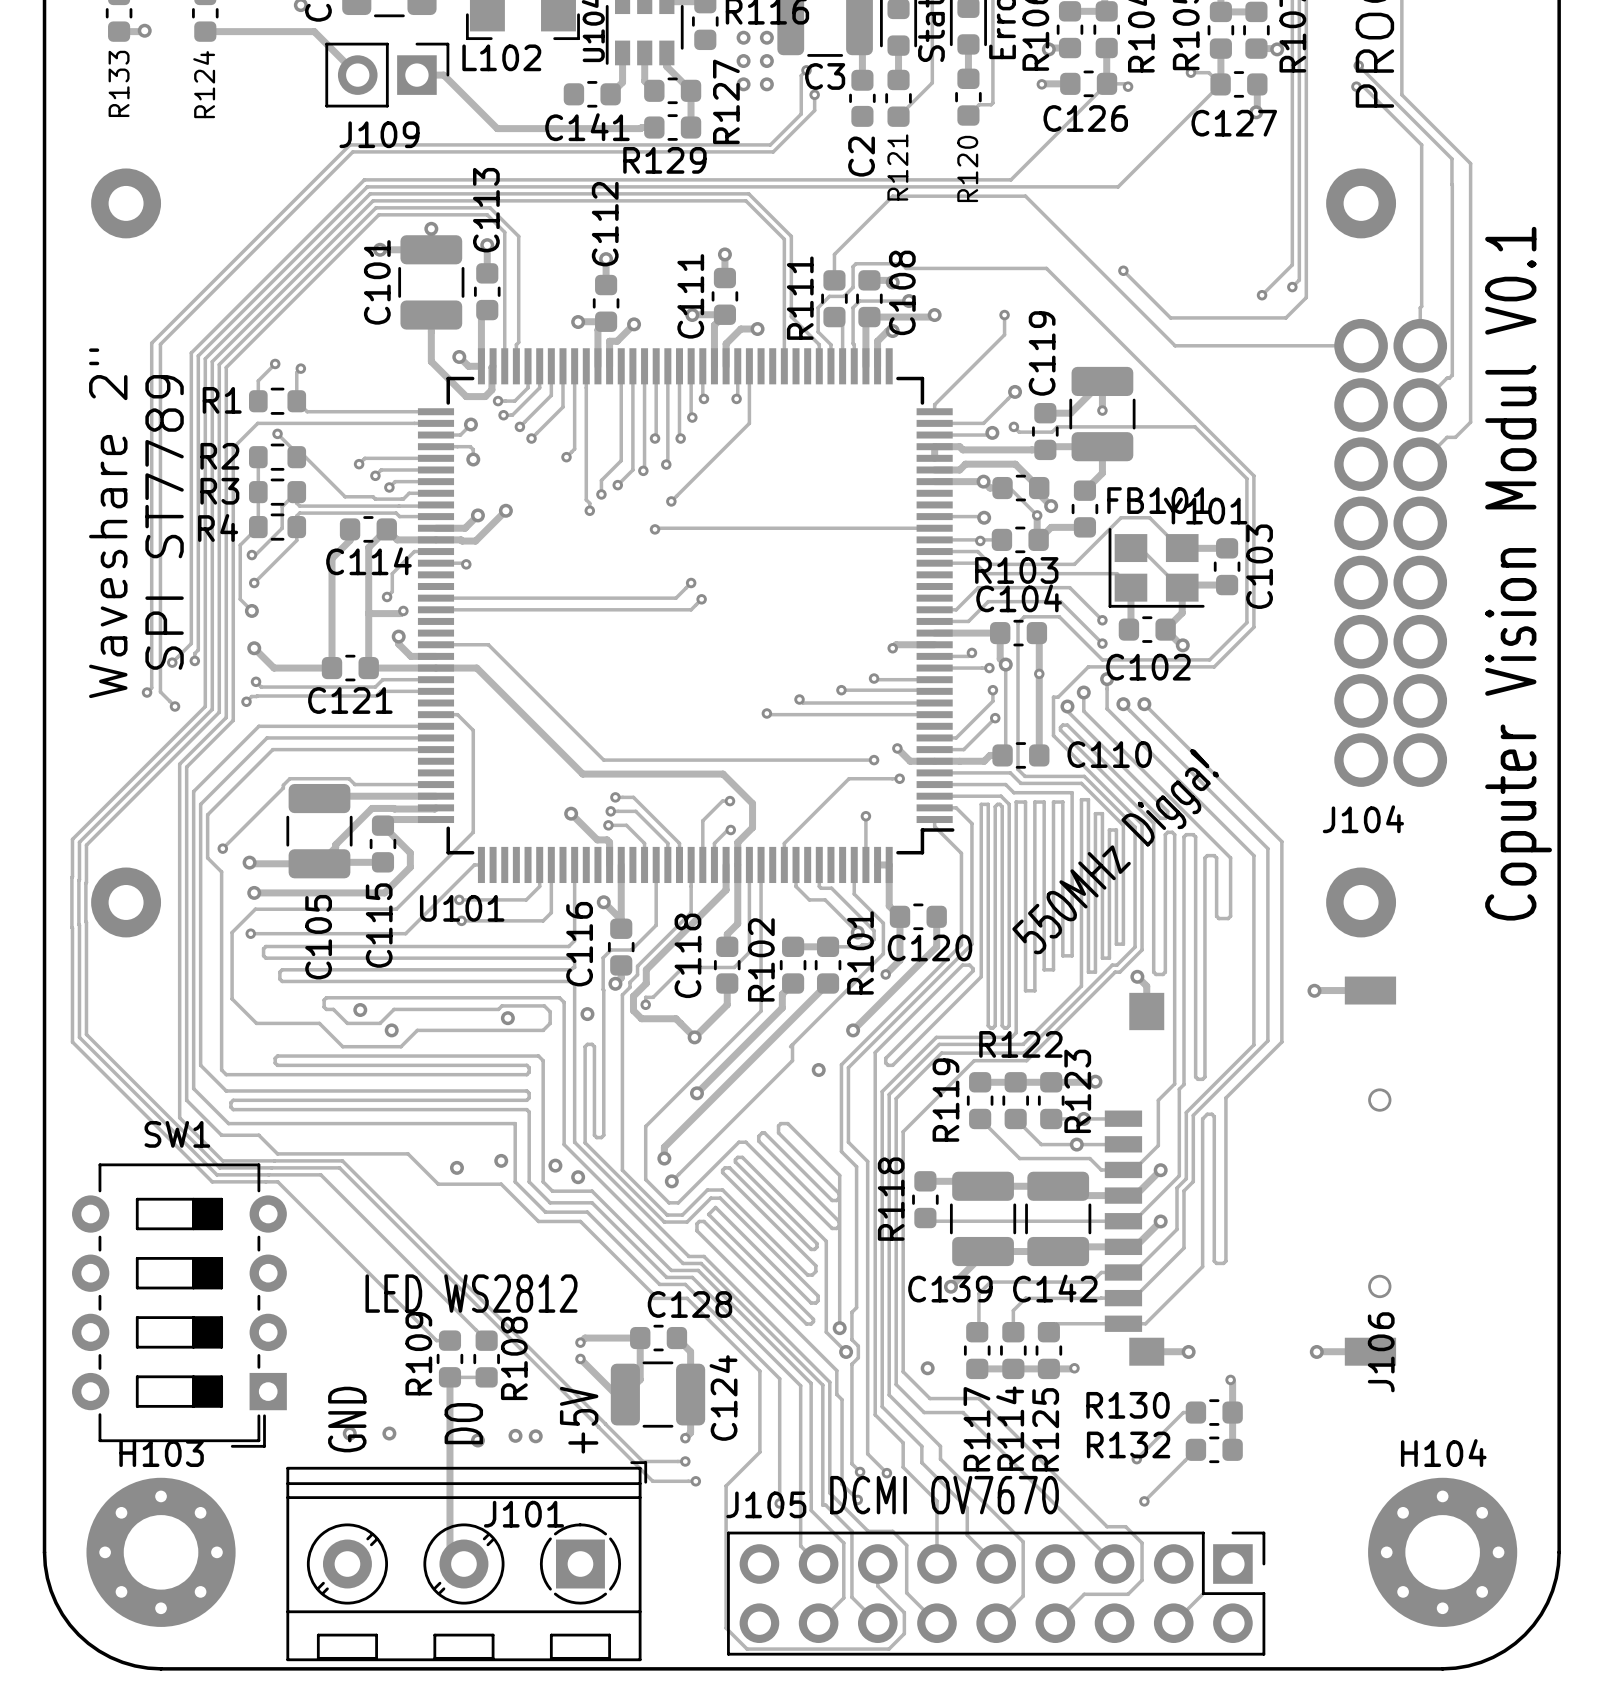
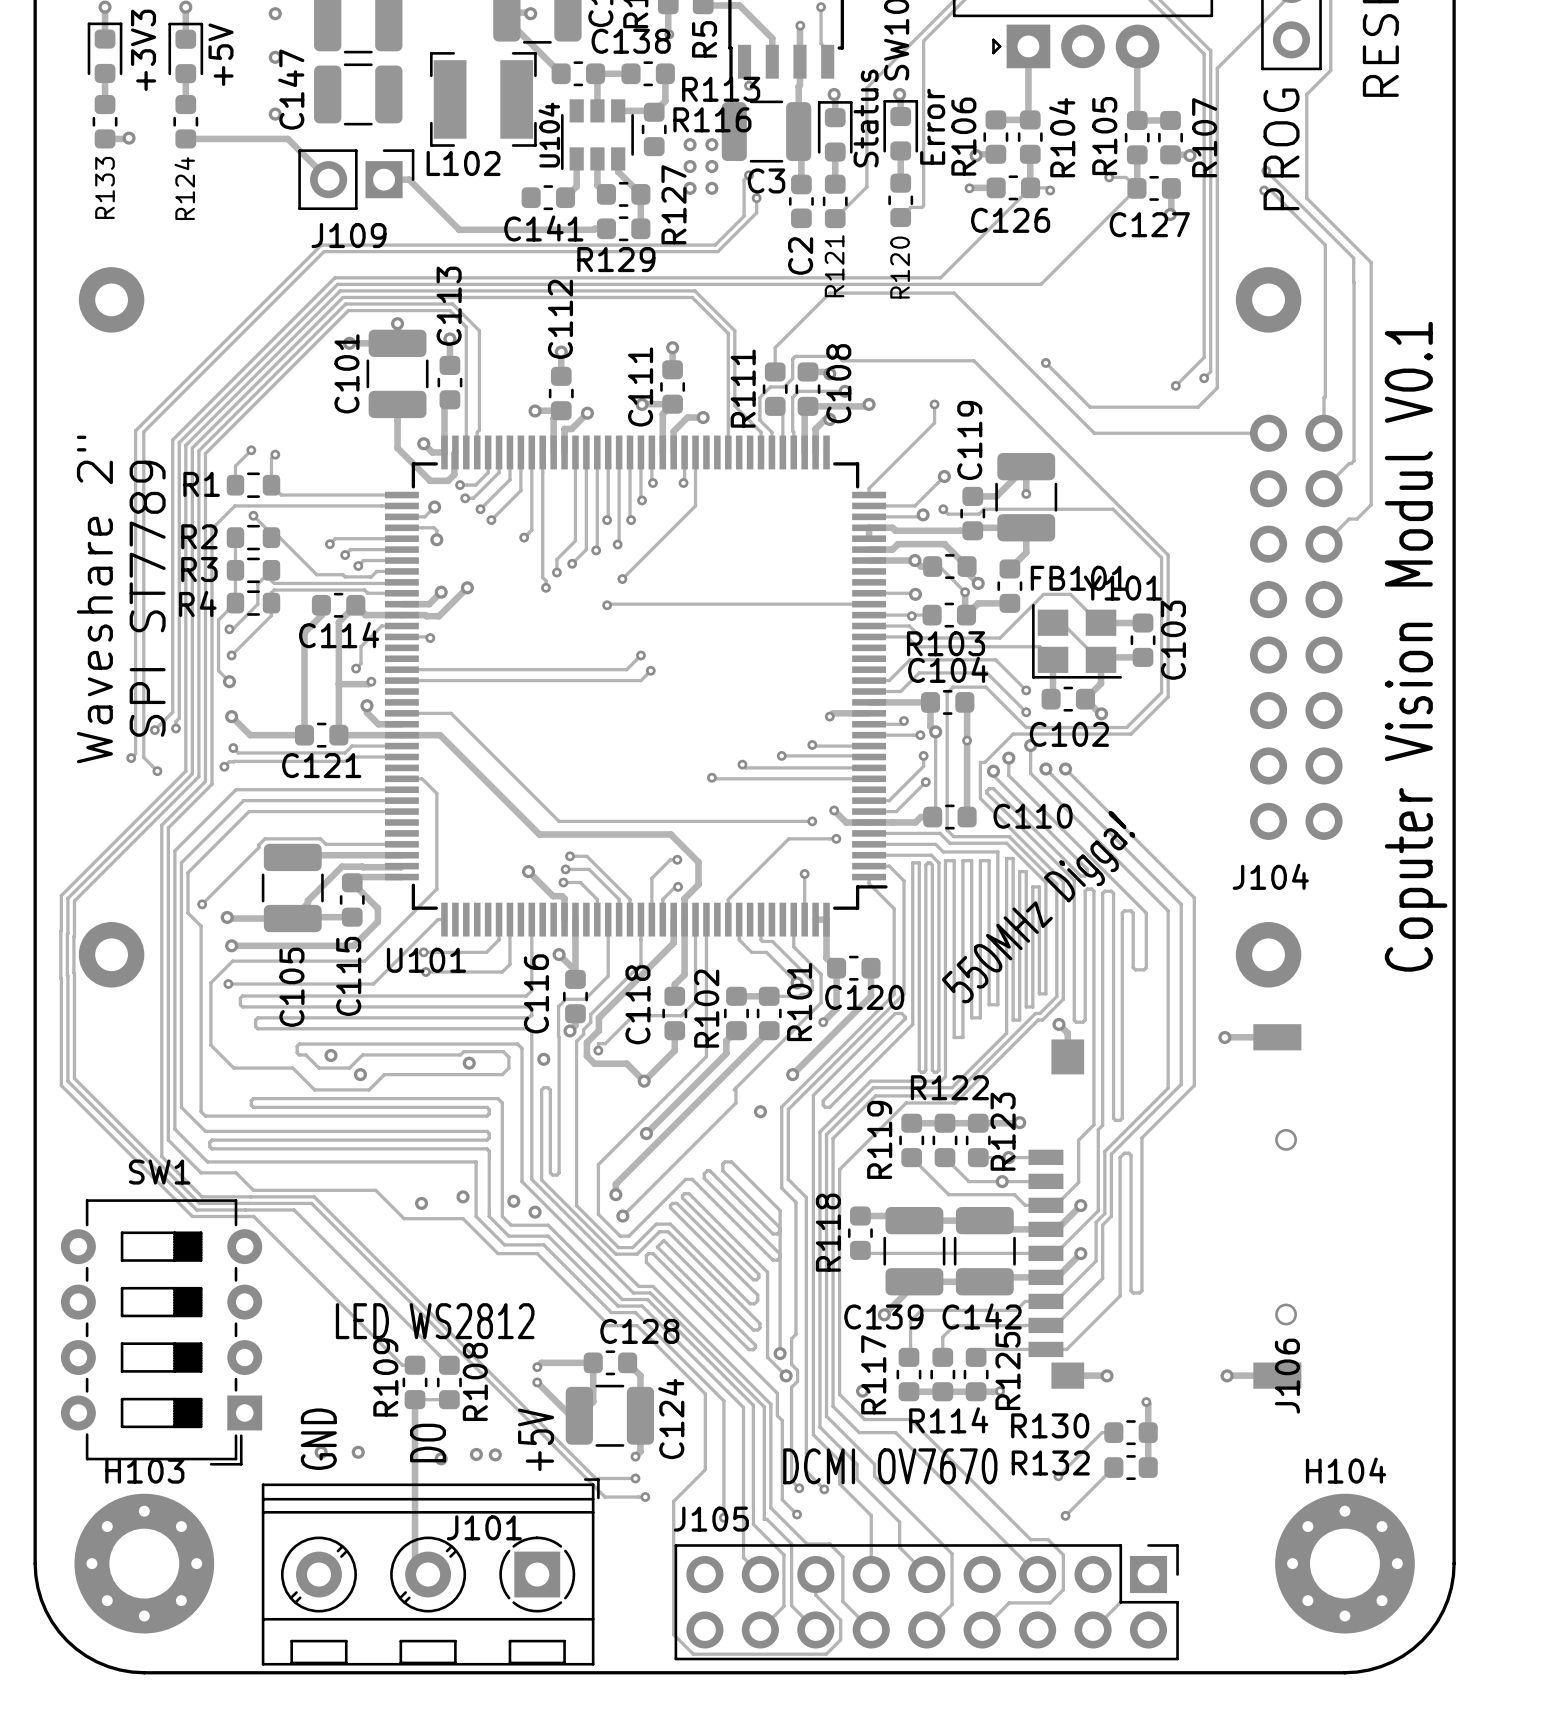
J104 footprint: [91, 168, 1448, 938] -> [78, 267, 1343, 988]
R114 name rotation: 0° (1010, 1428) -> 90° clockwise (948, 1420)
R117 name position: R117 (976, 1429) -> R117 (873, 1374)
R125 name position: R125 (1045, 1429) -> R125 (1007, 1370)
text position: DCMI OV7670 (944, 1495) -> DCMI OV7670 (890, 1466)

